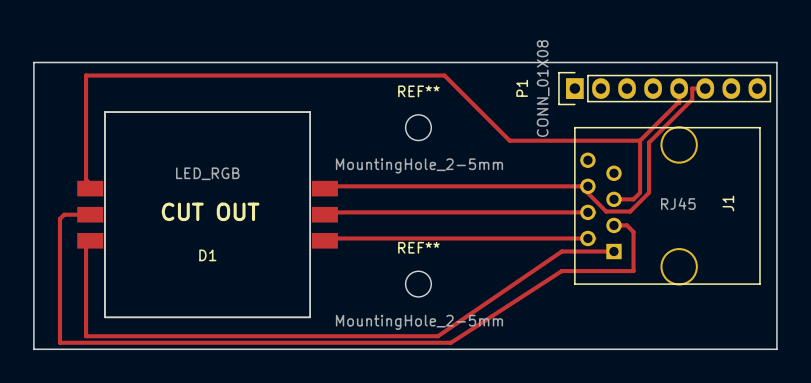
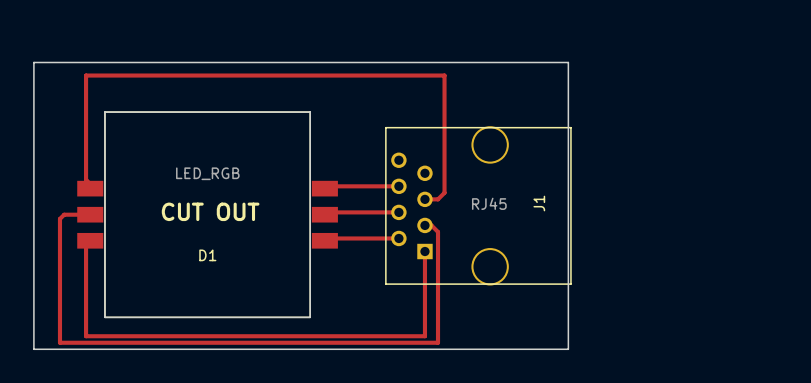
board edge: (568, 62) (776, 62) (776, 349) (568, 349) -> (568, 62) (568, 349)
track: (444, 75) (509, 140) (640, 140) -> (444, 75) (444, 192) (438, 199) (424, 199)
P1: CONN_01X08 (664, 88) -> none
track: (679, 88) (679, 103) (640, 140) -> none
track: (705, 88) (692, 88) (692, 99) (649, 142) (649, 192) (630, 211) (606, 211) (581, 186) -> none
REF**: MountingHole_2-5mm (418, 127) -> none
track: (640, 140) (640, 192) (633, 199) (613, 199) -> none
track: (398, 186) (587, 186) -> none
J1 position: (667, 205) -> (478, 205)
track: (398, 212) (594, 212) -> none
track: (613, 225) (627, 225) (633, 231) (633, 271) (561, 271) (451, 342) (438, 342) -> (424, 225) (431, 225) (438, 231) (438, 342)
track: (398, 238) (594, 238) -> none
track: (613, 251) (561, 251) (438, 336) (424, 336) -> (424, 251) (424, 336)
REF**: MountingHole_2-5mm (418, 284) -> none

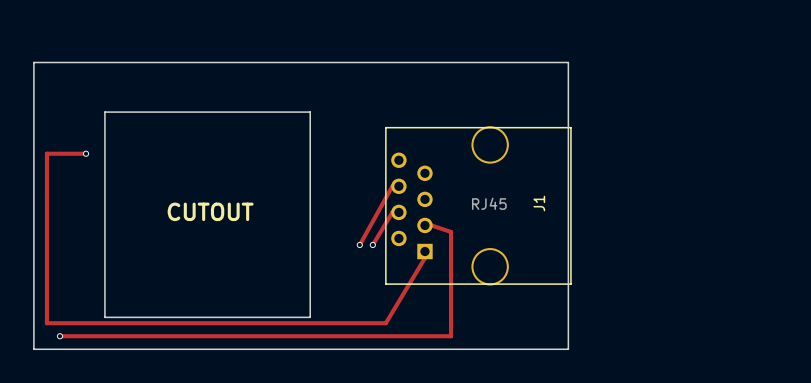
track: none -> (86, 153) (46, 153) (46, 323) (385, 323) (424, 258)
via: none -> (86, 153)
track: (392, 186) (327, 186) (324, 188) -> (392, 186) (359, 244)
track: (90, 188) (90, 184) (86, 179) (86, 75) (444, 75) (444, 192) (438, 199) (424, 199) -> none
text: CUT OUT (210, 211) -> CUTOUT (210, 211)
track: (392, 212) (327, 212) (324, 214) -> (392, 212) (372, 244)
track: (90, 214) (64, 214) (59, 218) (59, 342) (438, 342) (438, 231) (431, 225) -> none
D1: LED_RGB (207, 214) -> none
track: (398, 238) (327, 238) (324, 240) -> none
track: (90, 240) (86, 244) (86, 336) -> (59, 336) (86, 336)
via: none -> (359, 244)
via: none -> (372, 244)
track: (424, 258) (424, 336) -> (431, 225) (451, 231) (451, 336) (424, 336)
via: none -> (59, 336)

